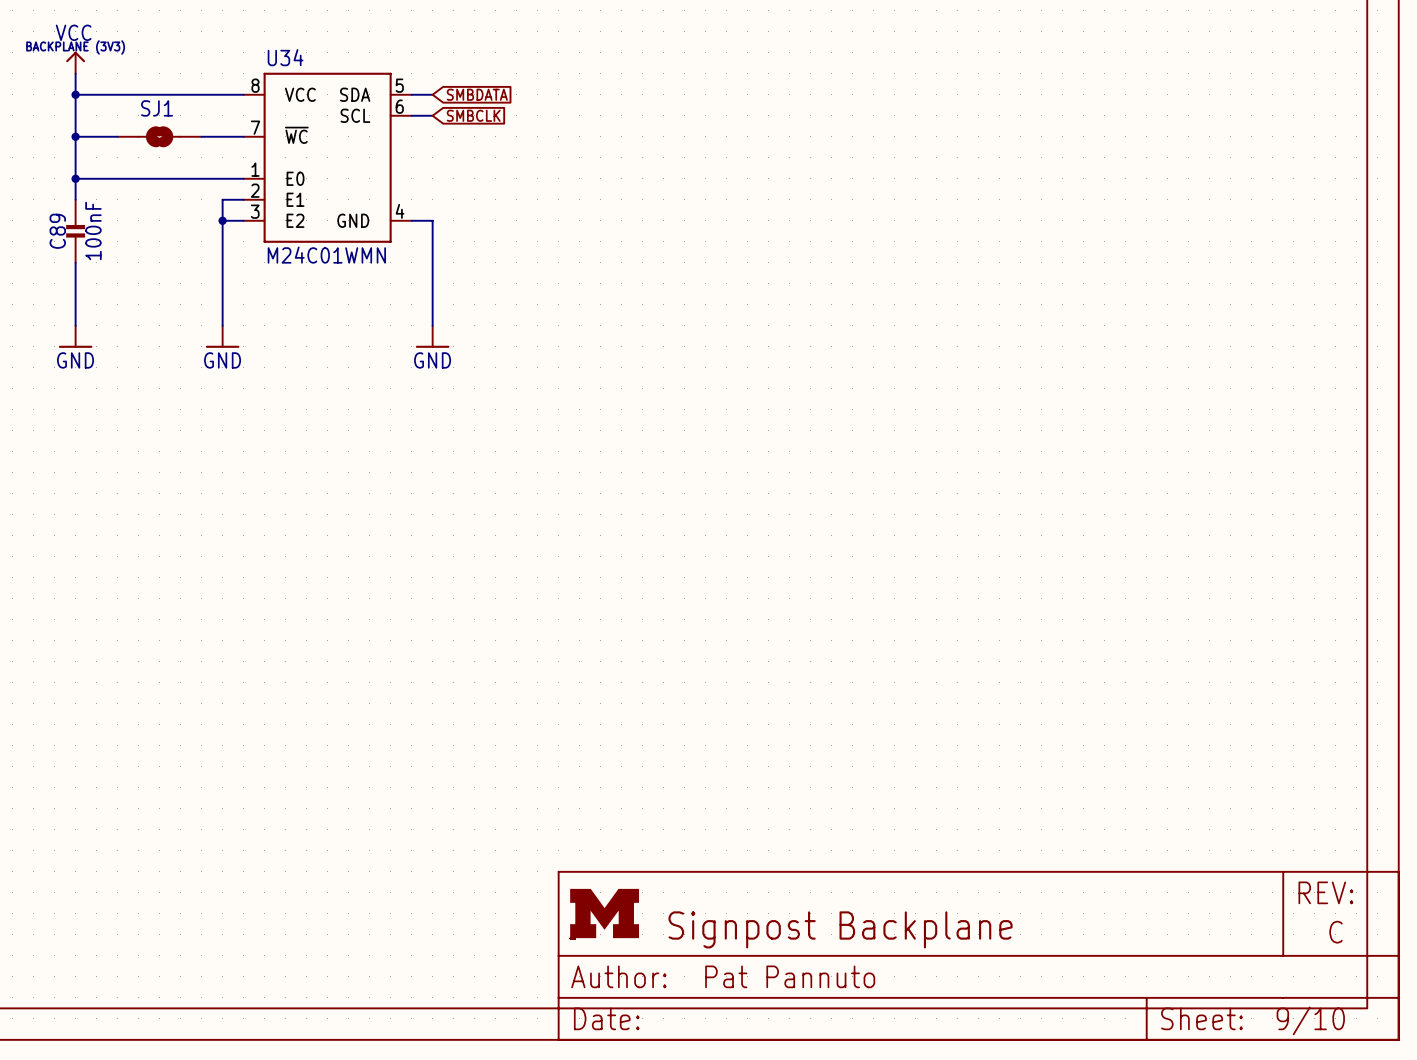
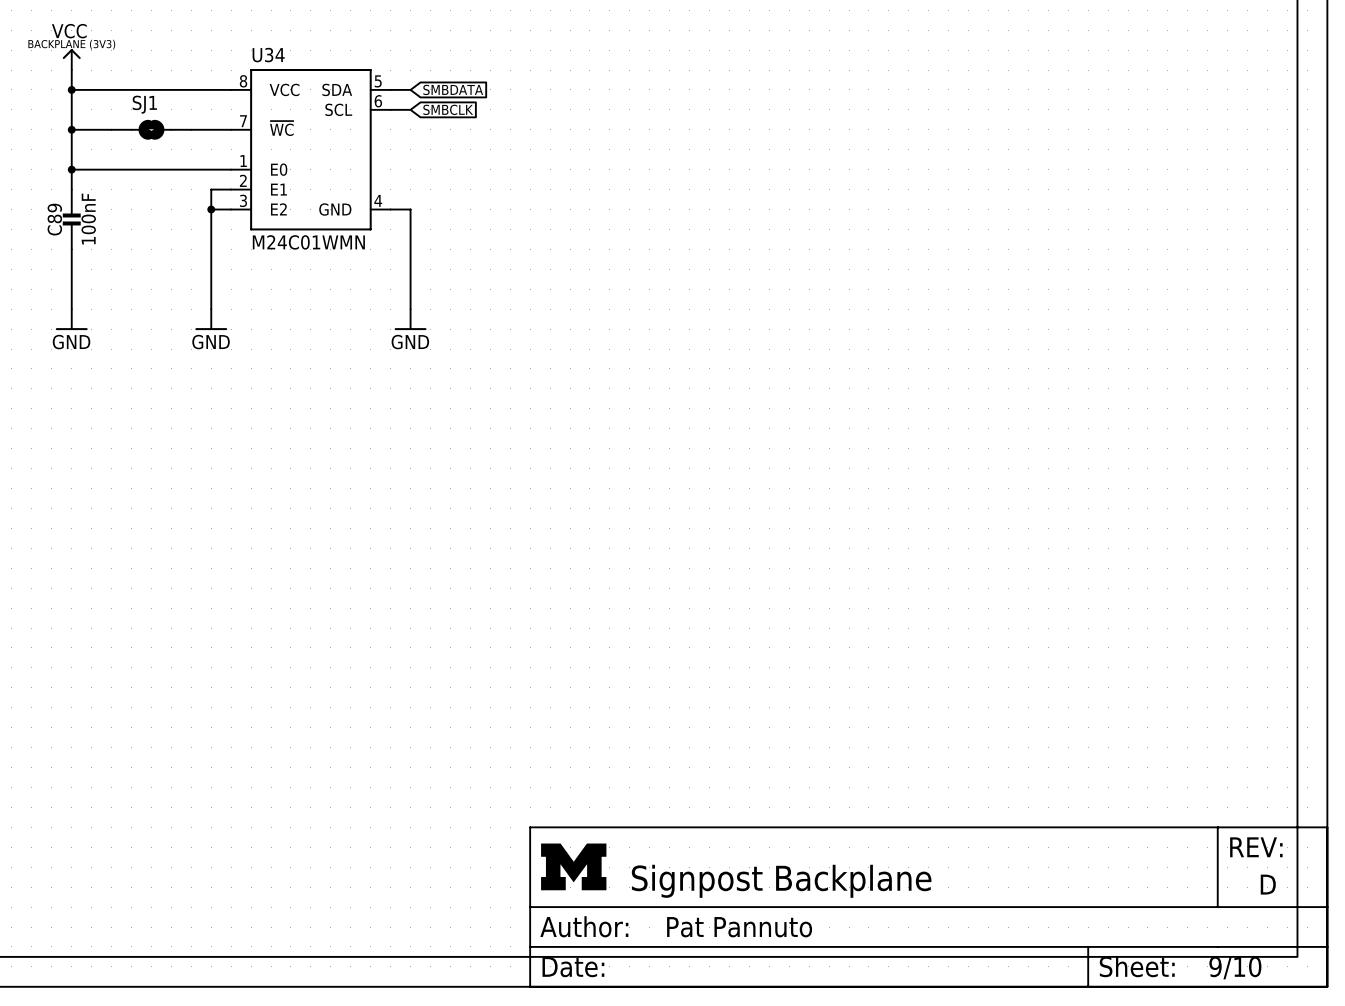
part text: C (1336, 932) -> D (1268, 884)

